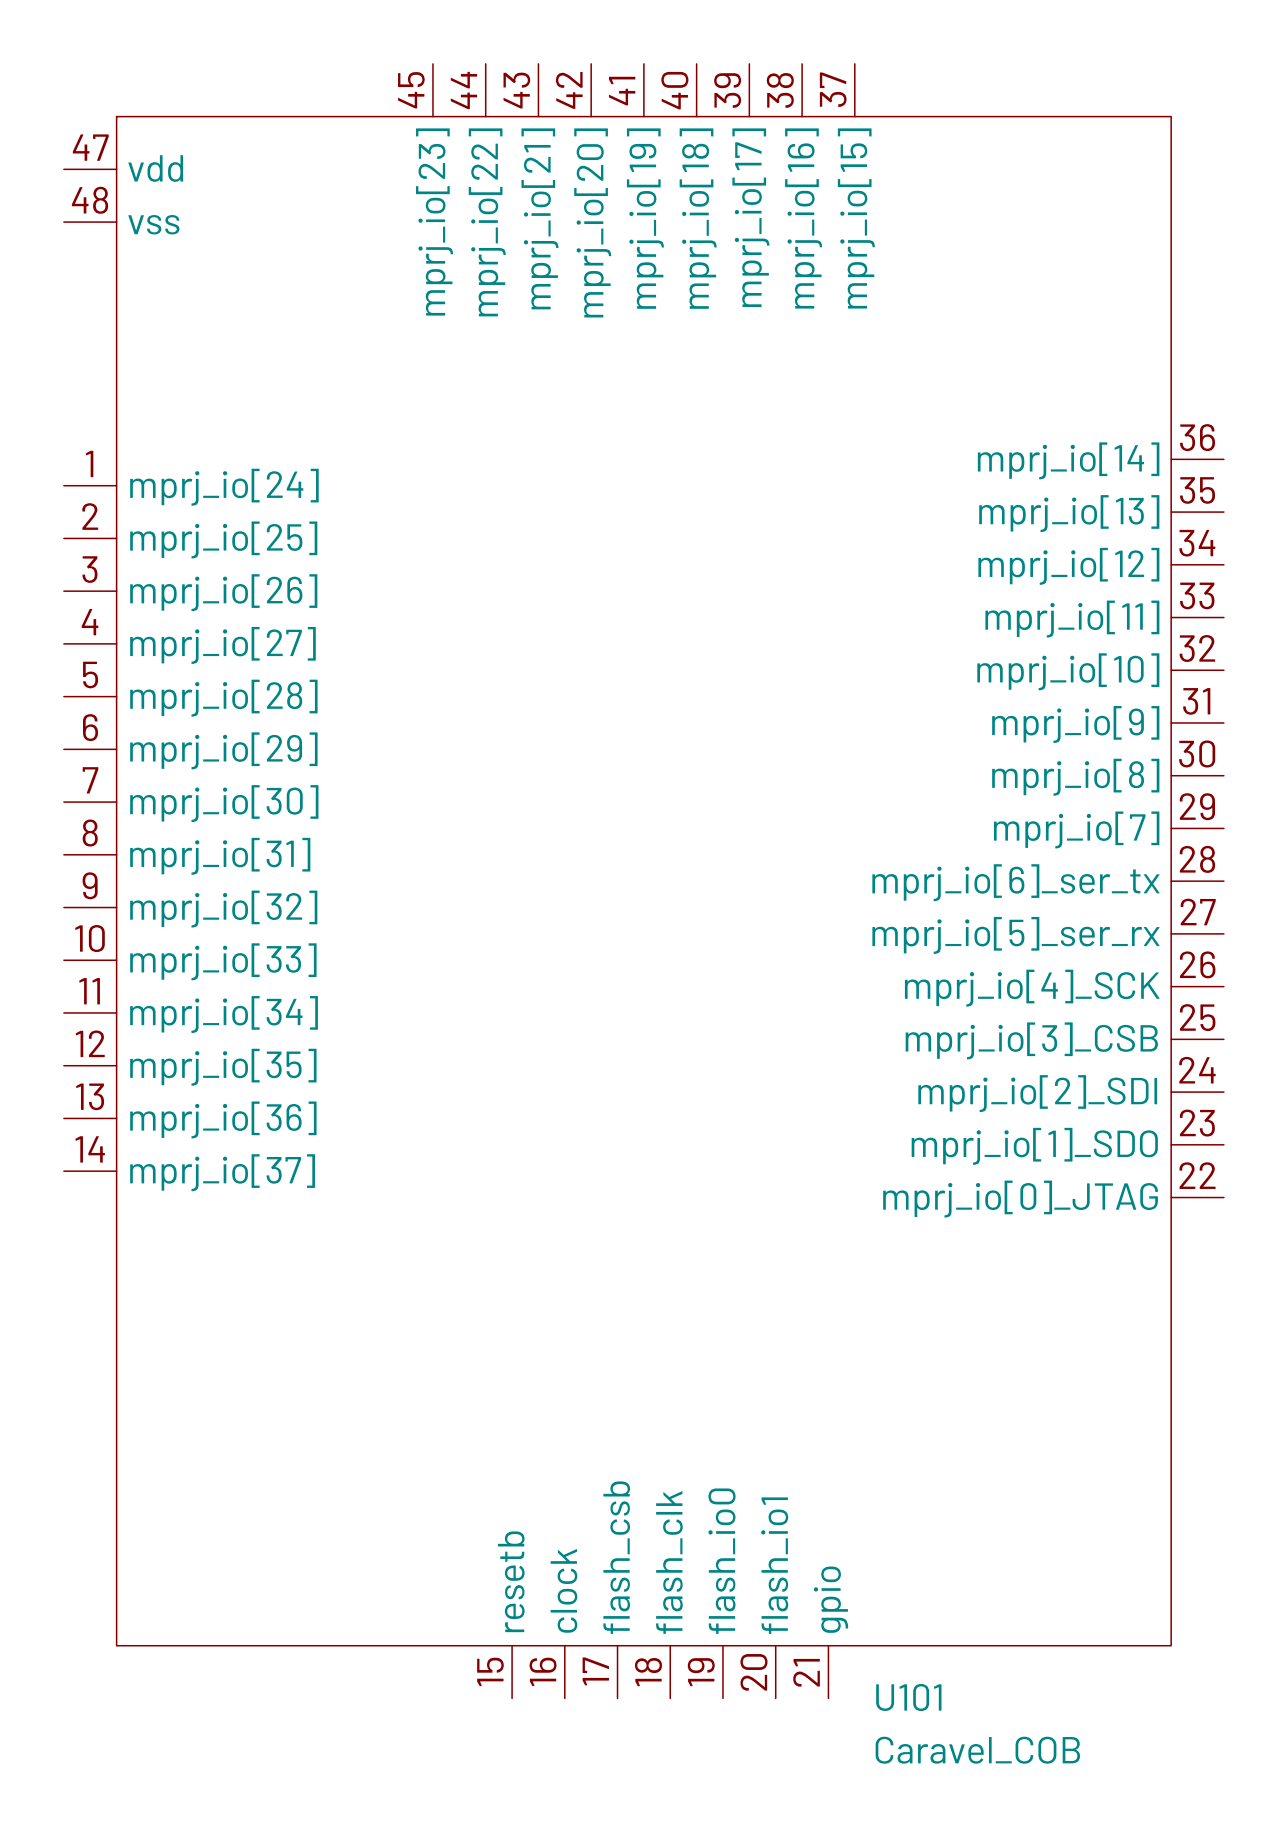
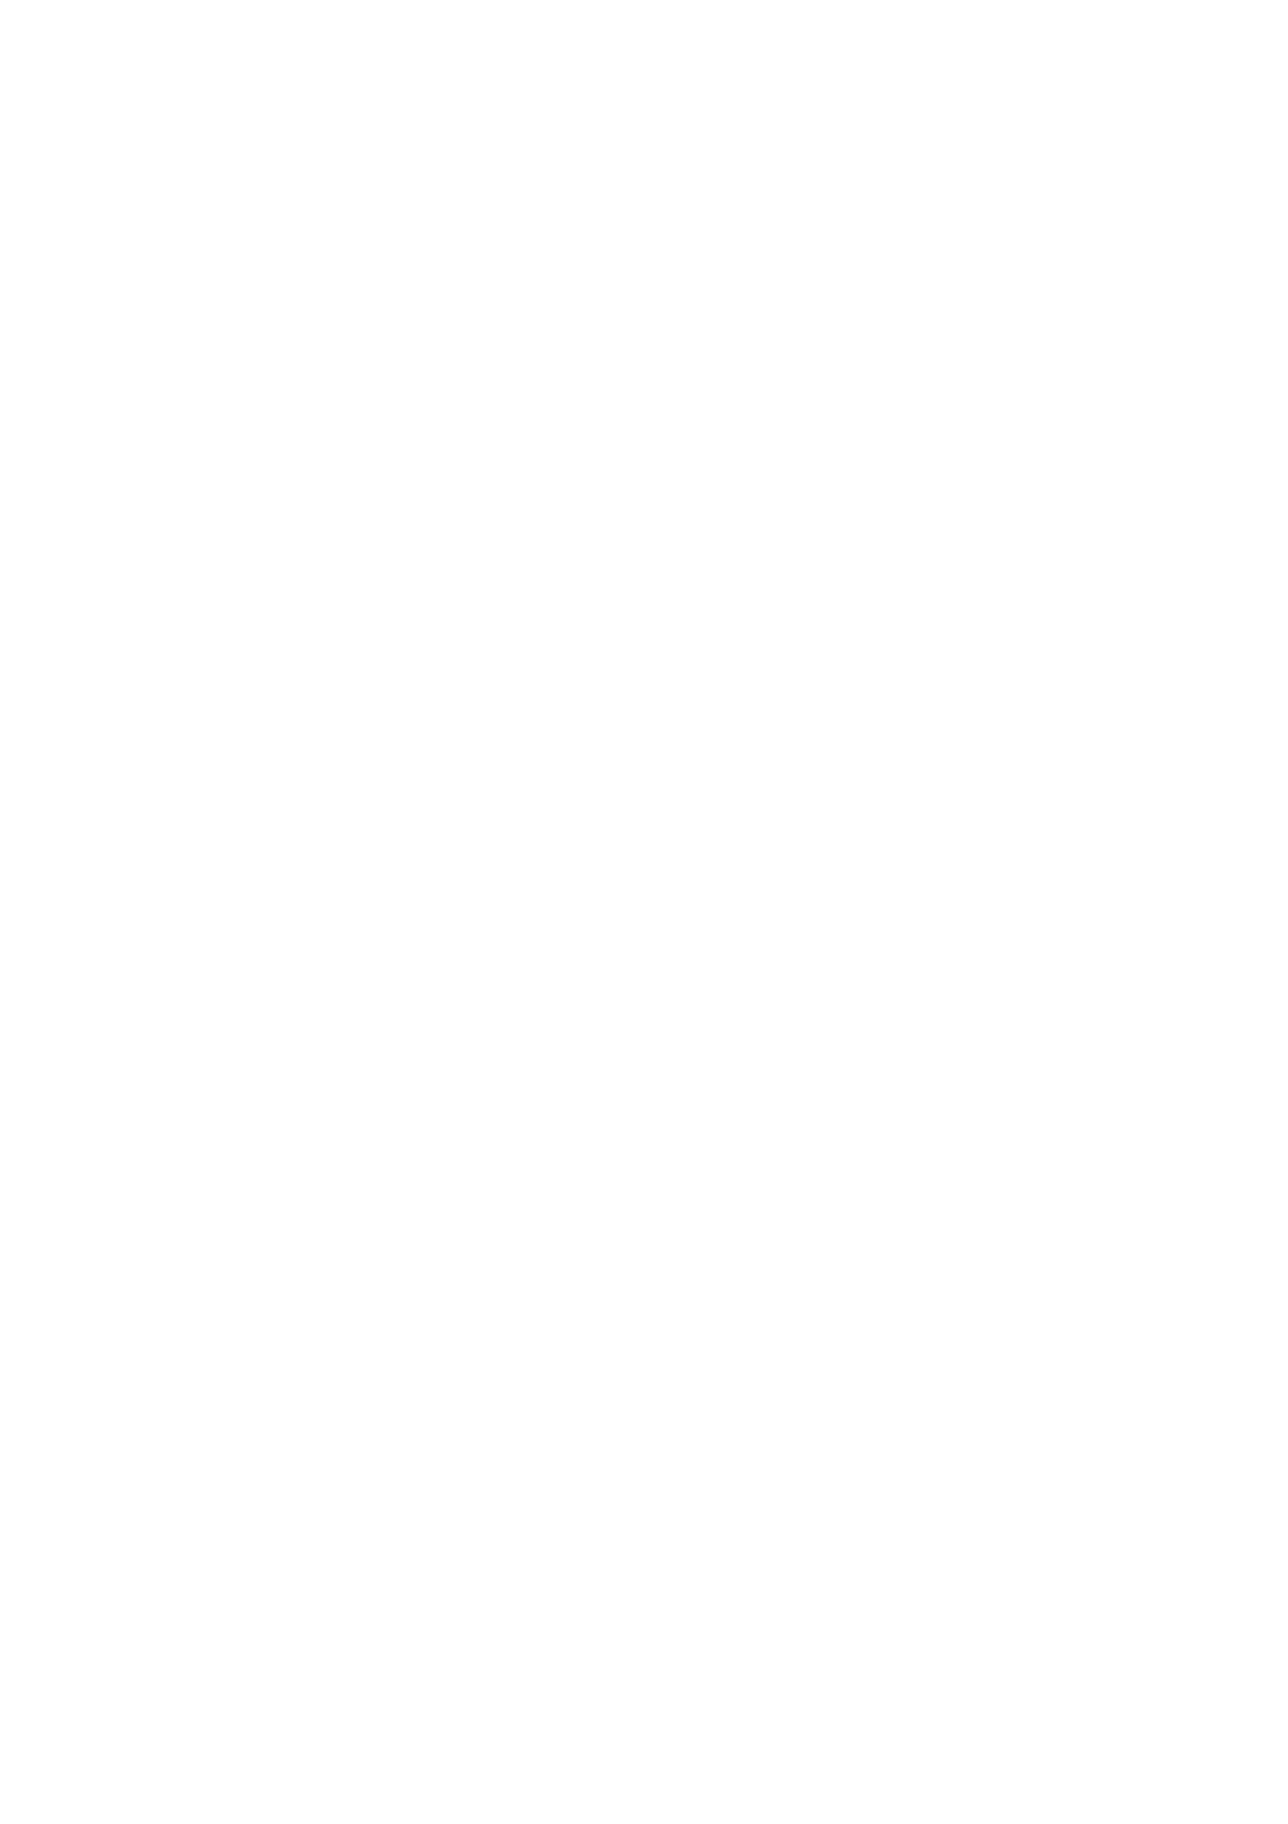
U101: Caravel_COB (643, 881) -> none

